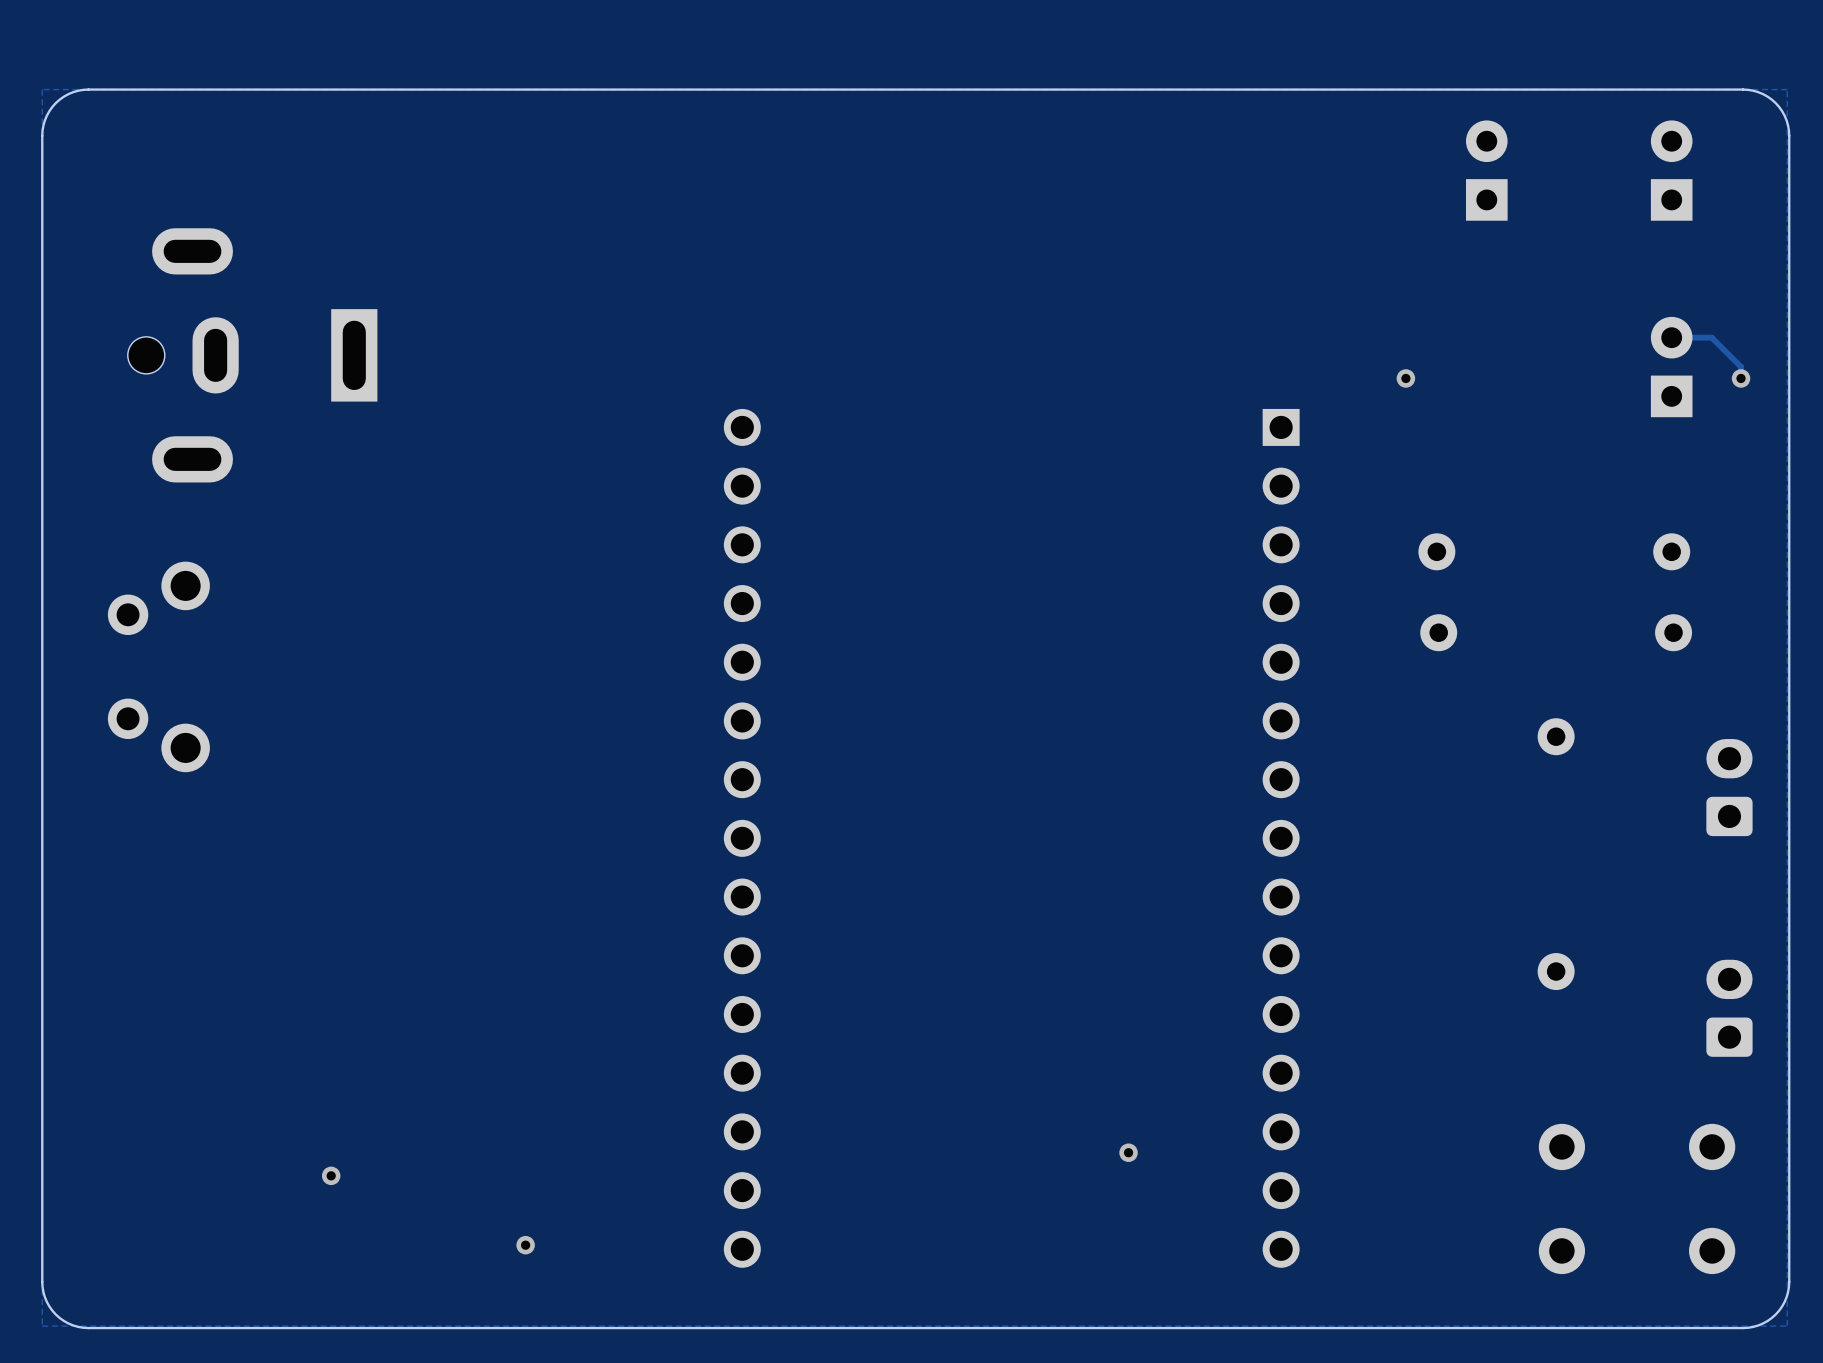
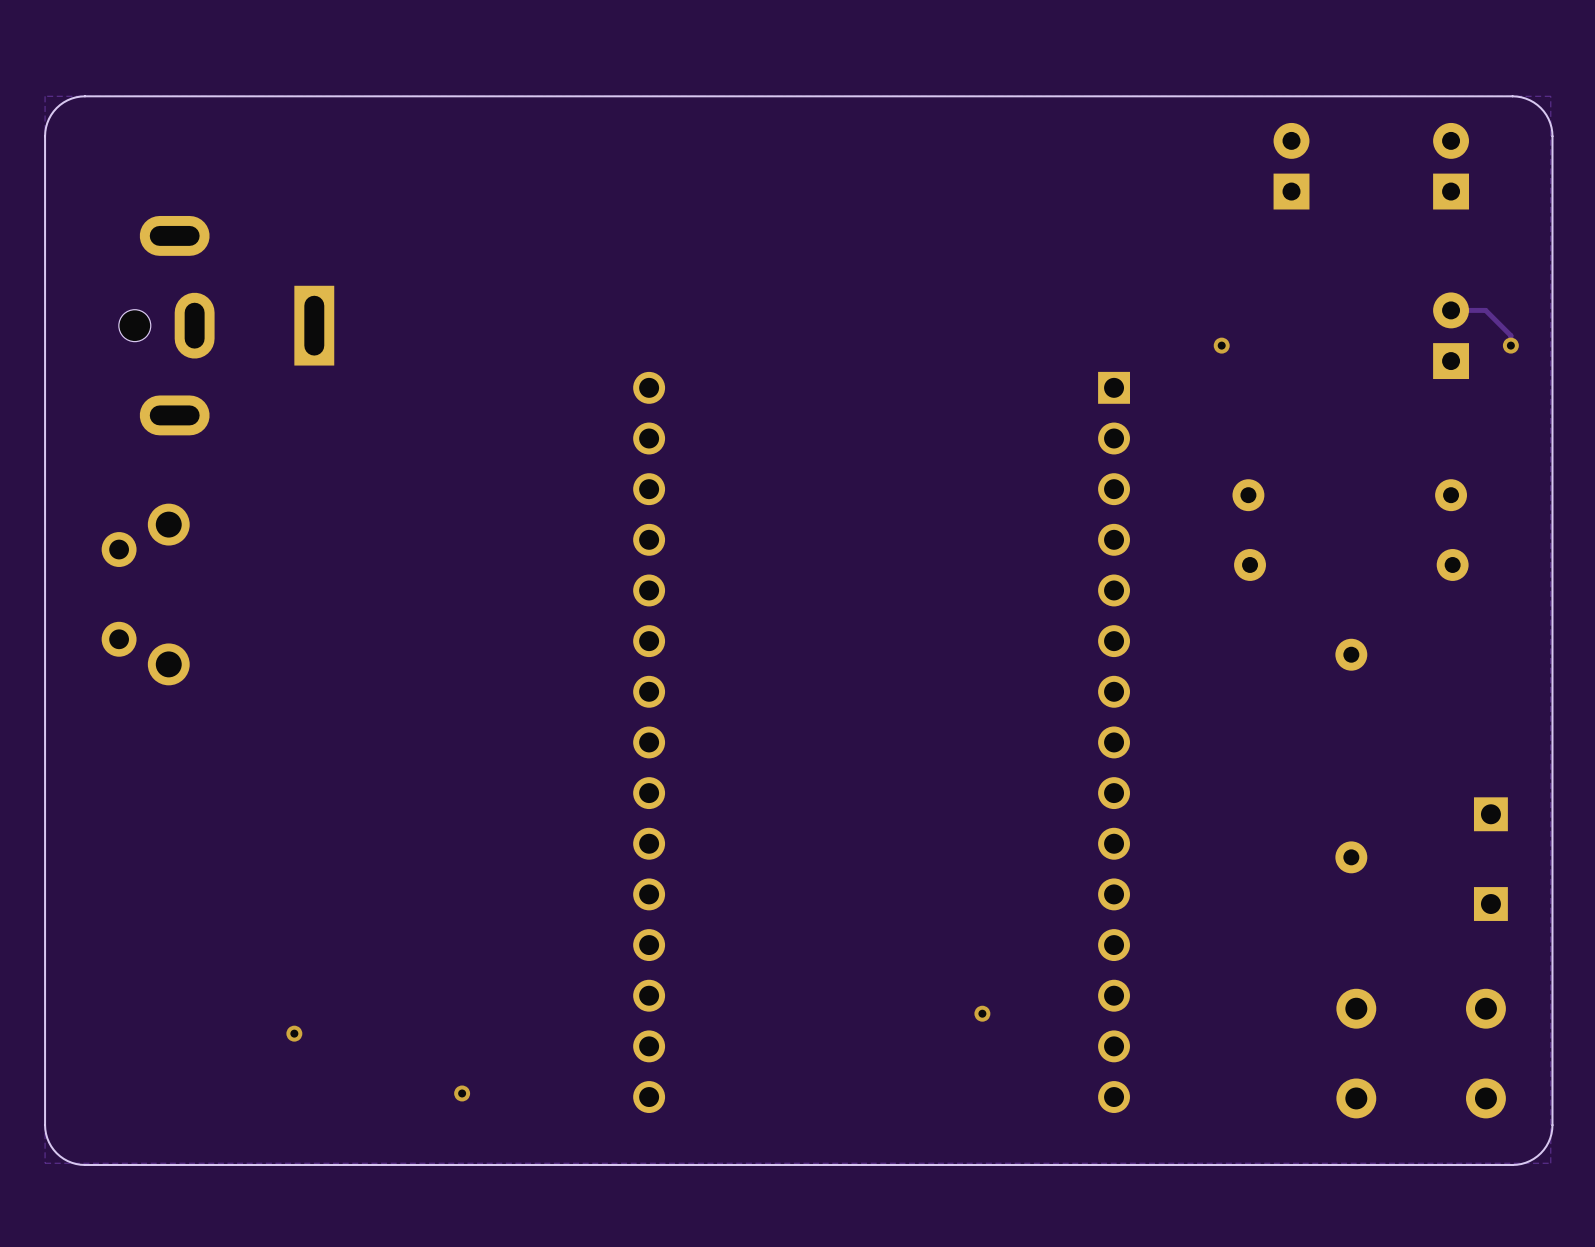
part: (1729, 787) -> none
part: none -> (1490, 814)
part footprint: [1706, 959, 1753, 1057] -> [1473, 887, 1508, 921]

